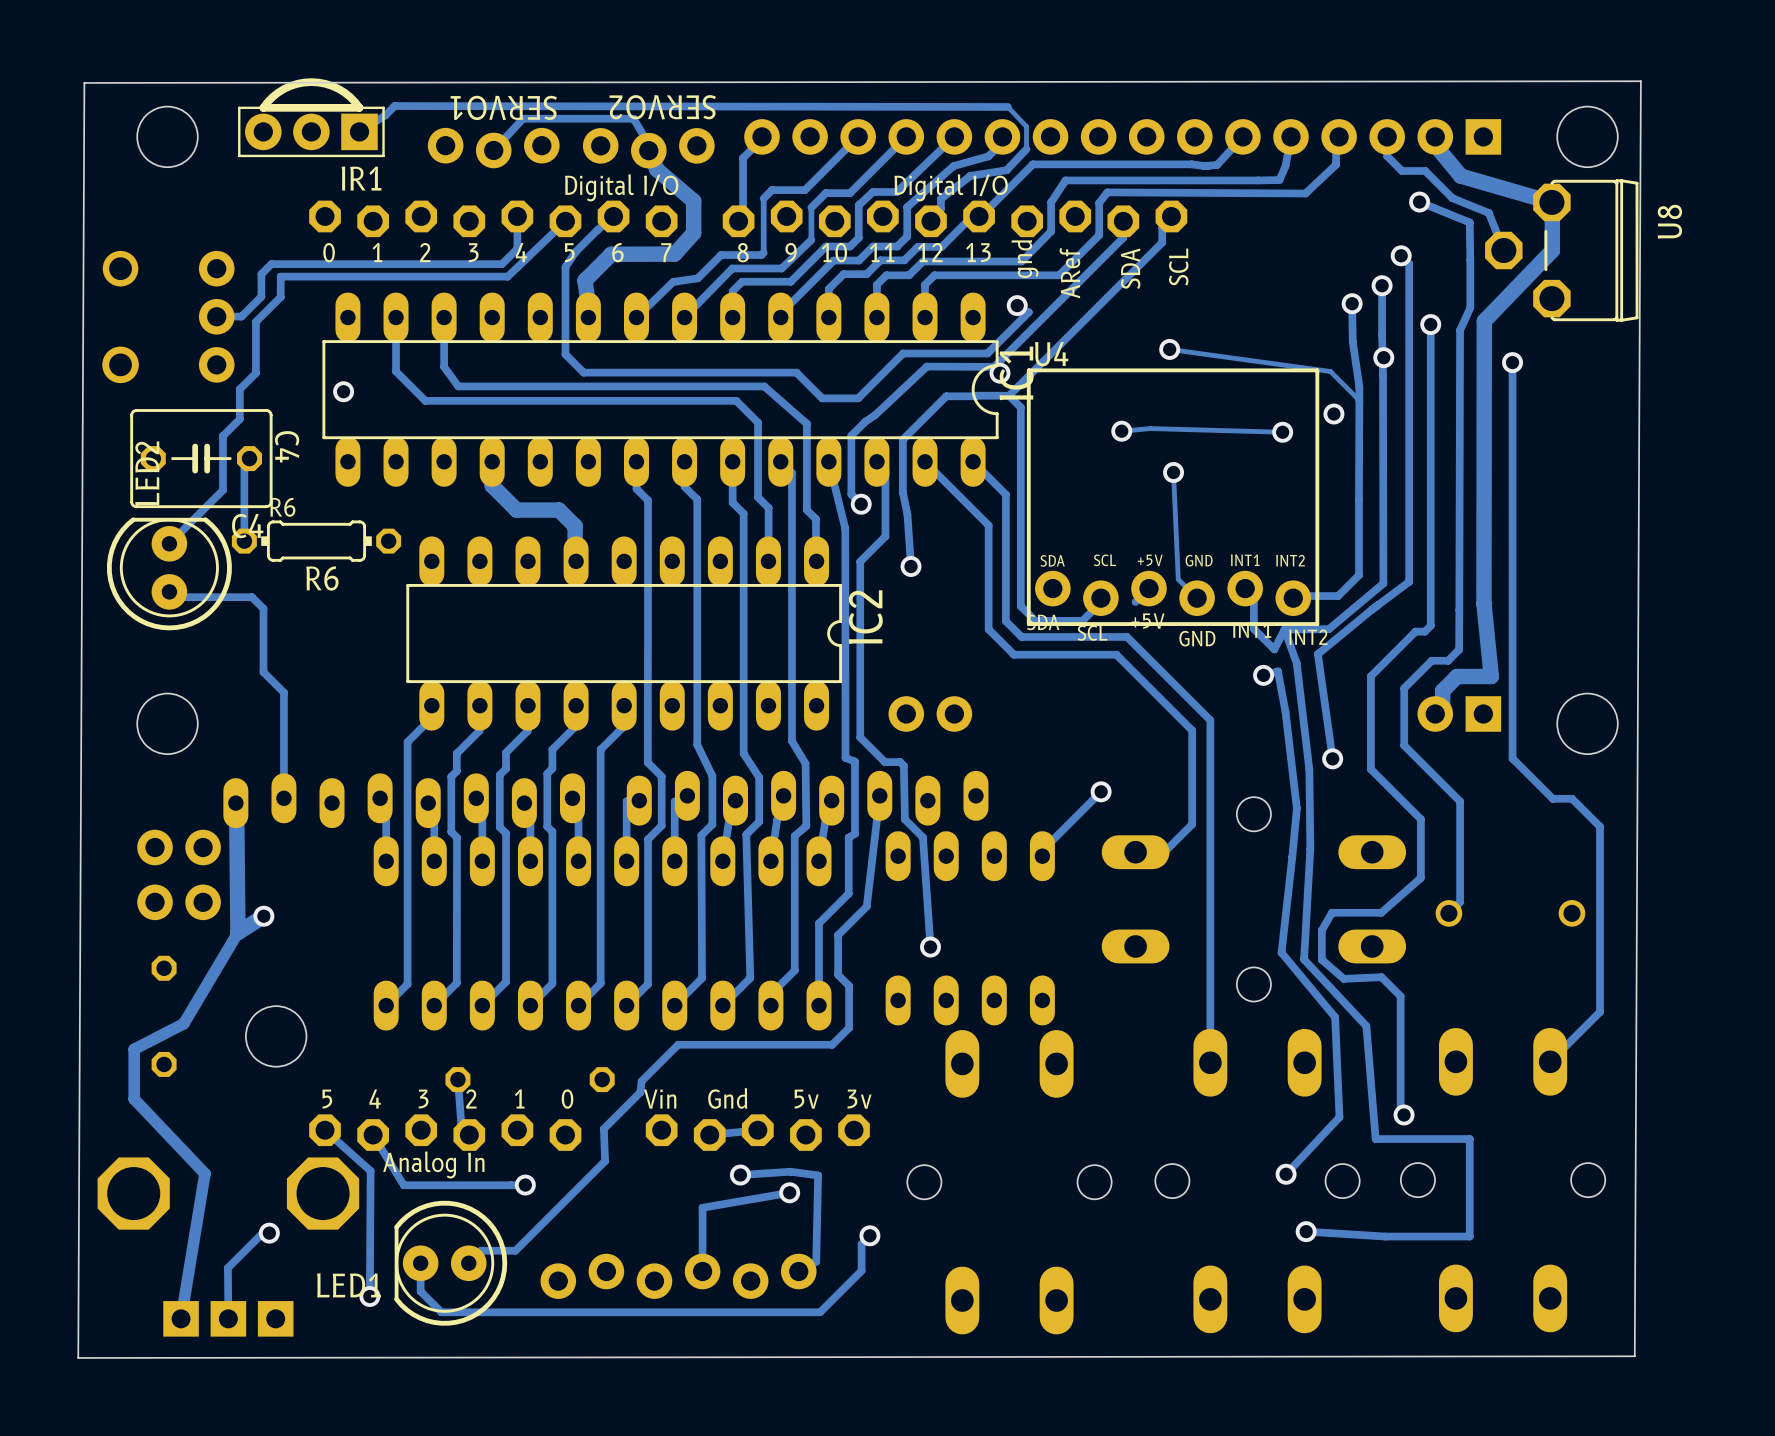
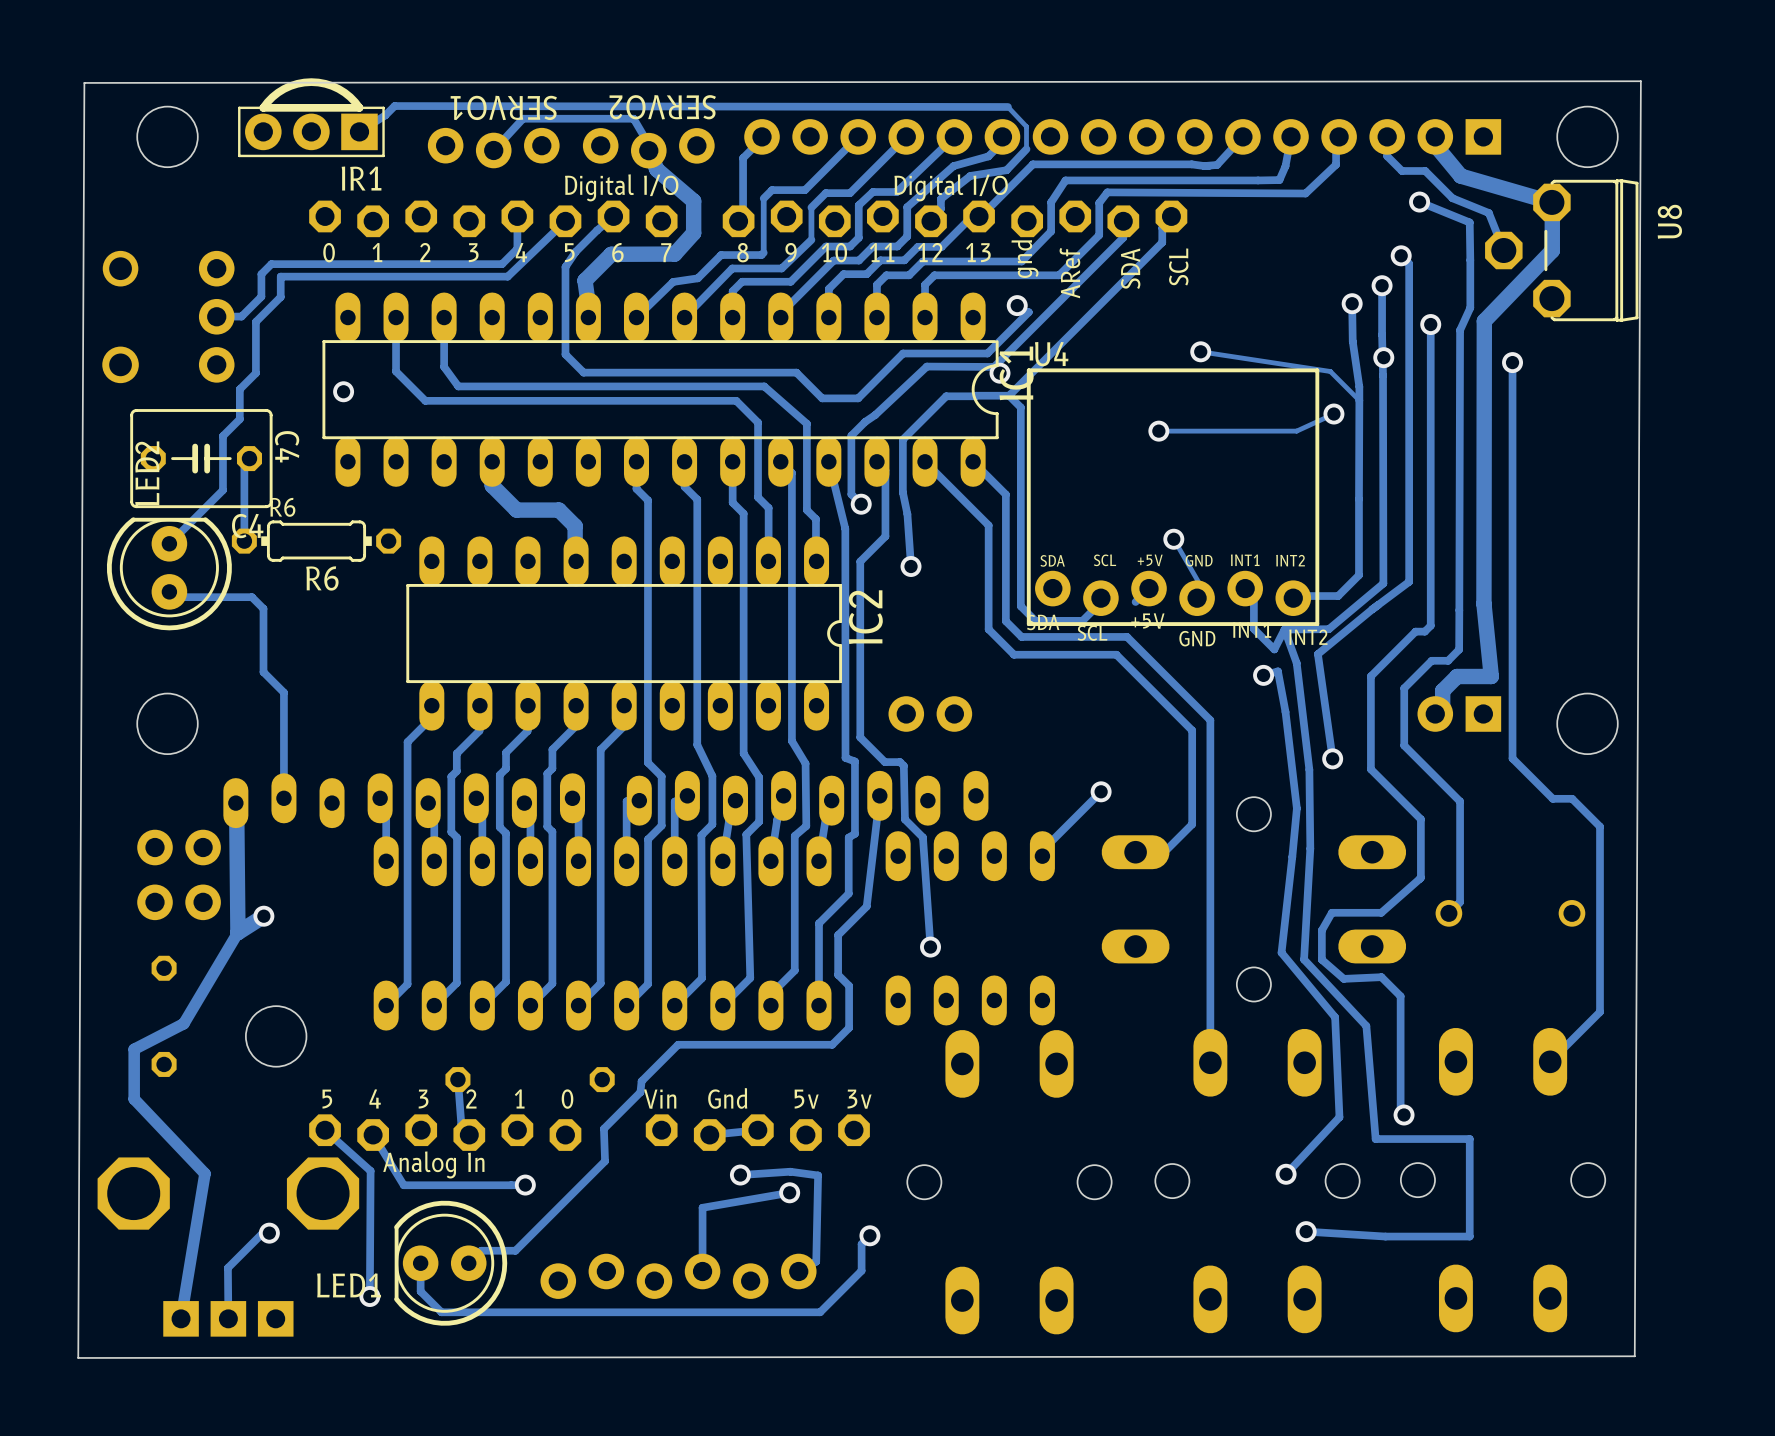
track: (1169, 349) (1330, 371) -> (1200, 351) (1330, 371)
via position: (1169, 349) -> (1200, 351)
track: none -> (1333, 414) (1296, 431) (1158, 431)
track: (1121, 431) (1150, 428) (1282, 432) -> none
via: (1121, 431) -> none
via: none -> (1158, 431)
via: (1282, 432) -> none
track: (1173, 472) (1178, 579) (1197, 598) -> none
via: (1173, 472) -> none
track: none -> (1173, 539) (1203, 591)
via: none -> (1173, 539)

